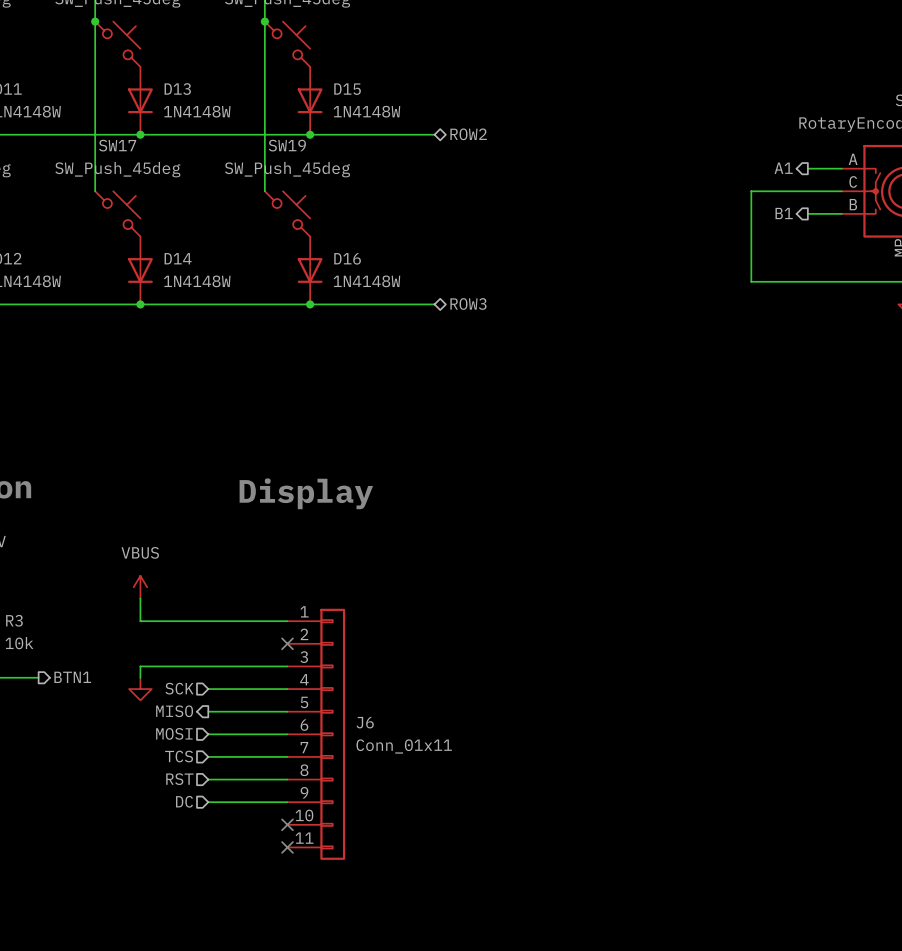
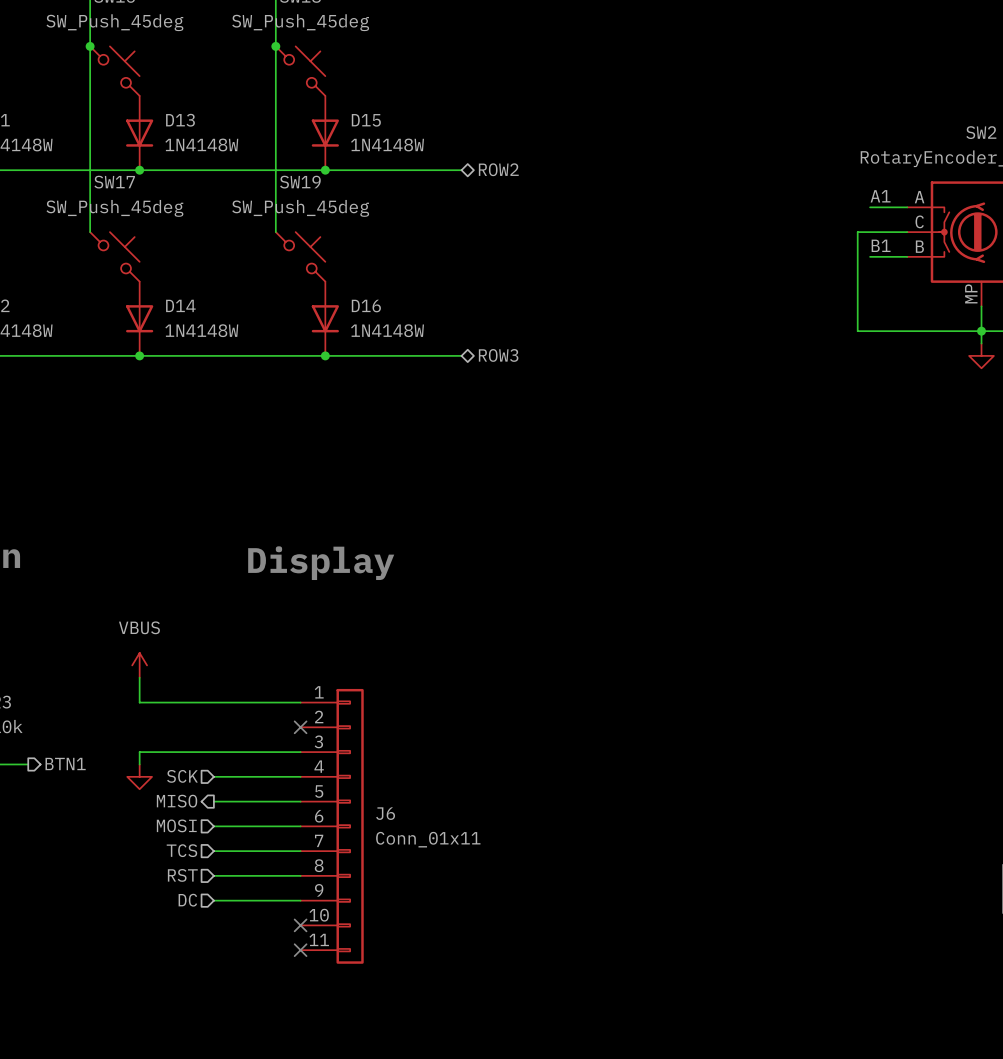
label: none -> A1 (880, 196)
hierarchical label: A1 (783, 168) -> none
wire: (796, 191) (751, 191) (751, 281) (796, 281) -> (857, 232) (857, 331)
label: none -> B1 (881, 245)
hierarchical label: B1 (784, 213) -> none

